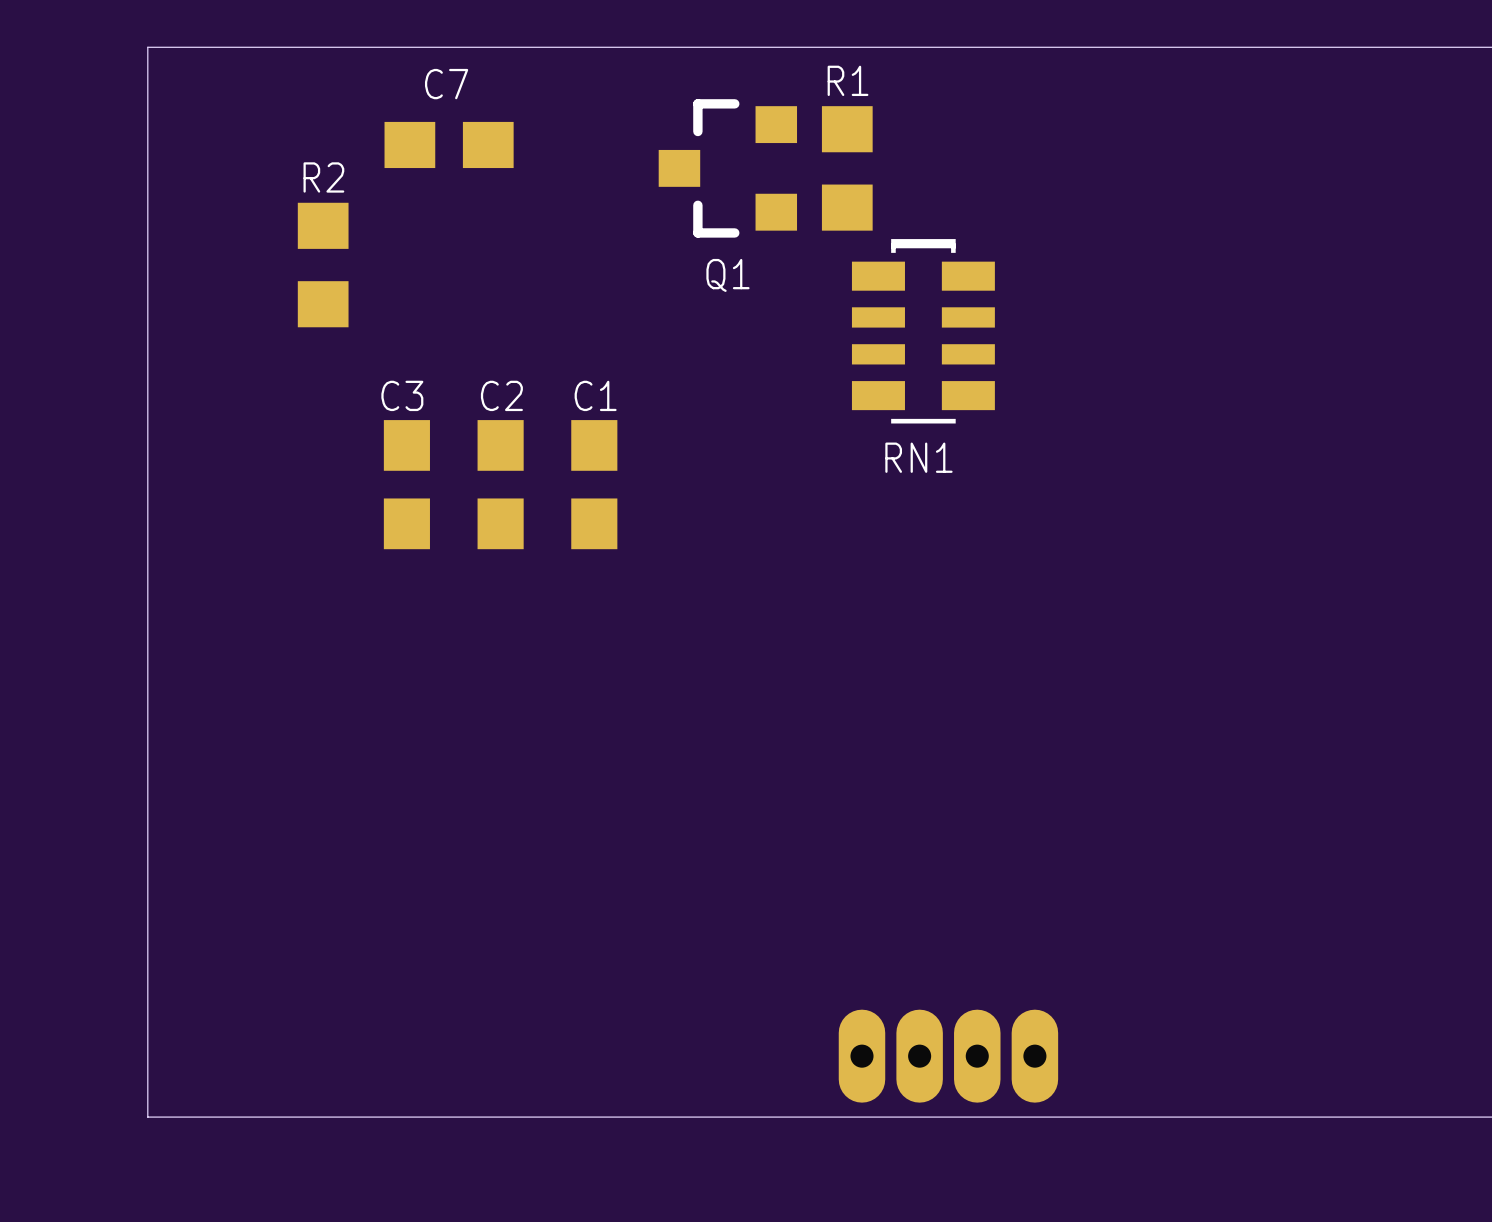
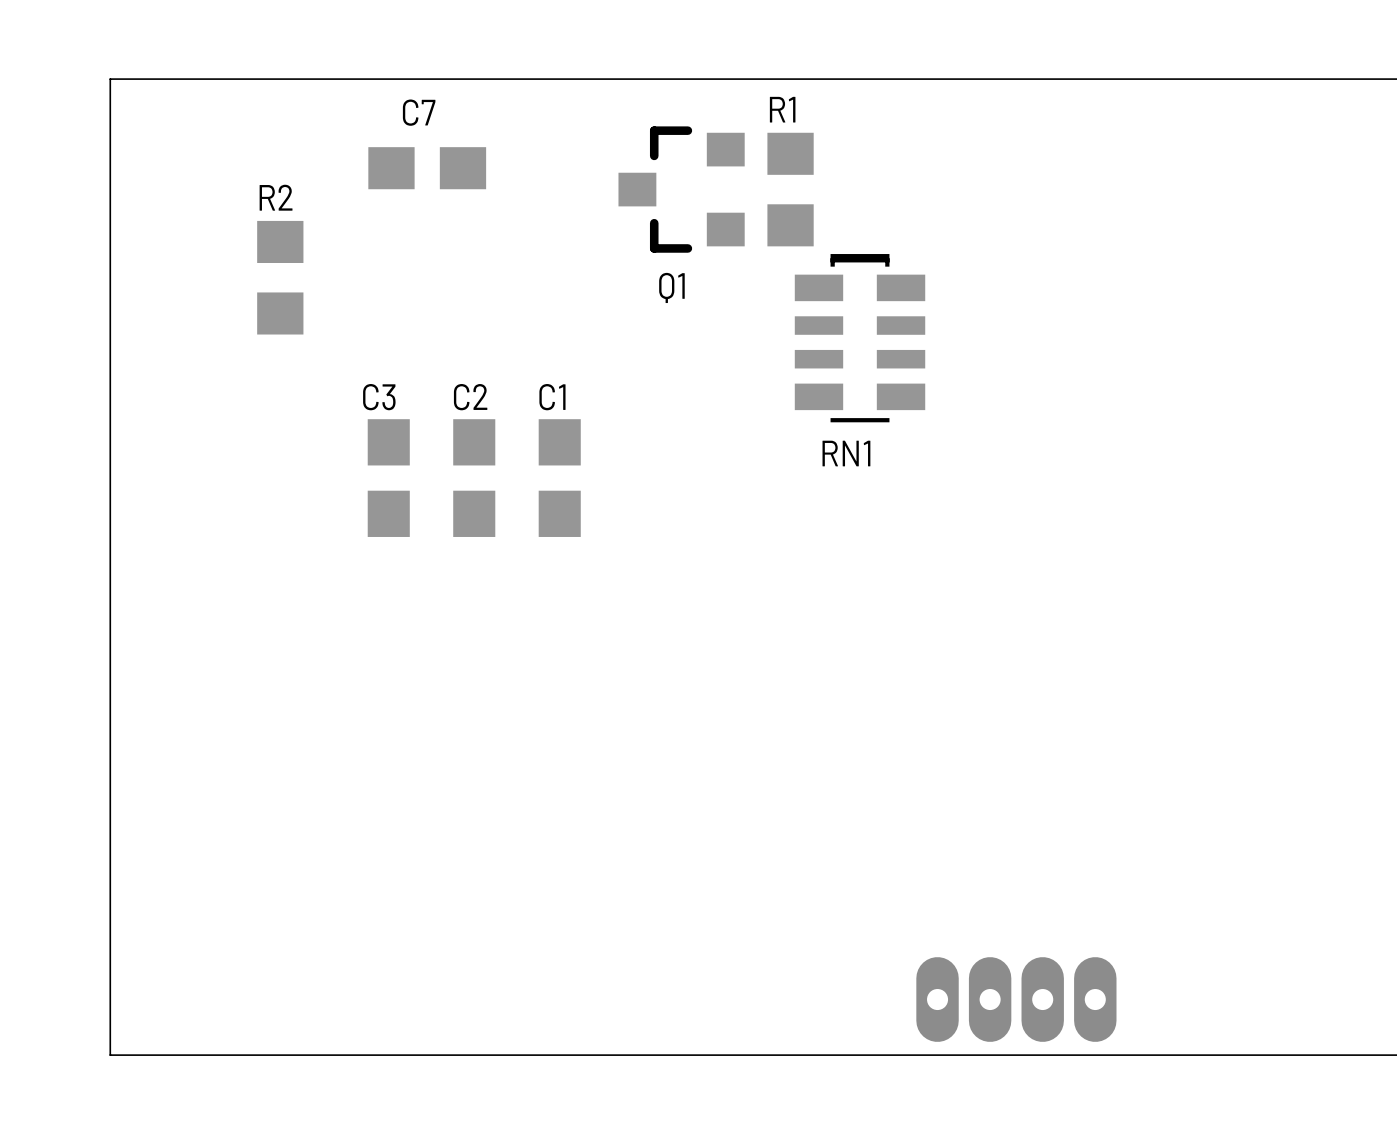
board edge: (147, 47) (147, 1117) -> (152, 79) (110, 79) (110, 1055) (152, 1055)
R2 position: (323, 265) -> (280, 277)
part position: (948, 1056) -> (1016, 999)

